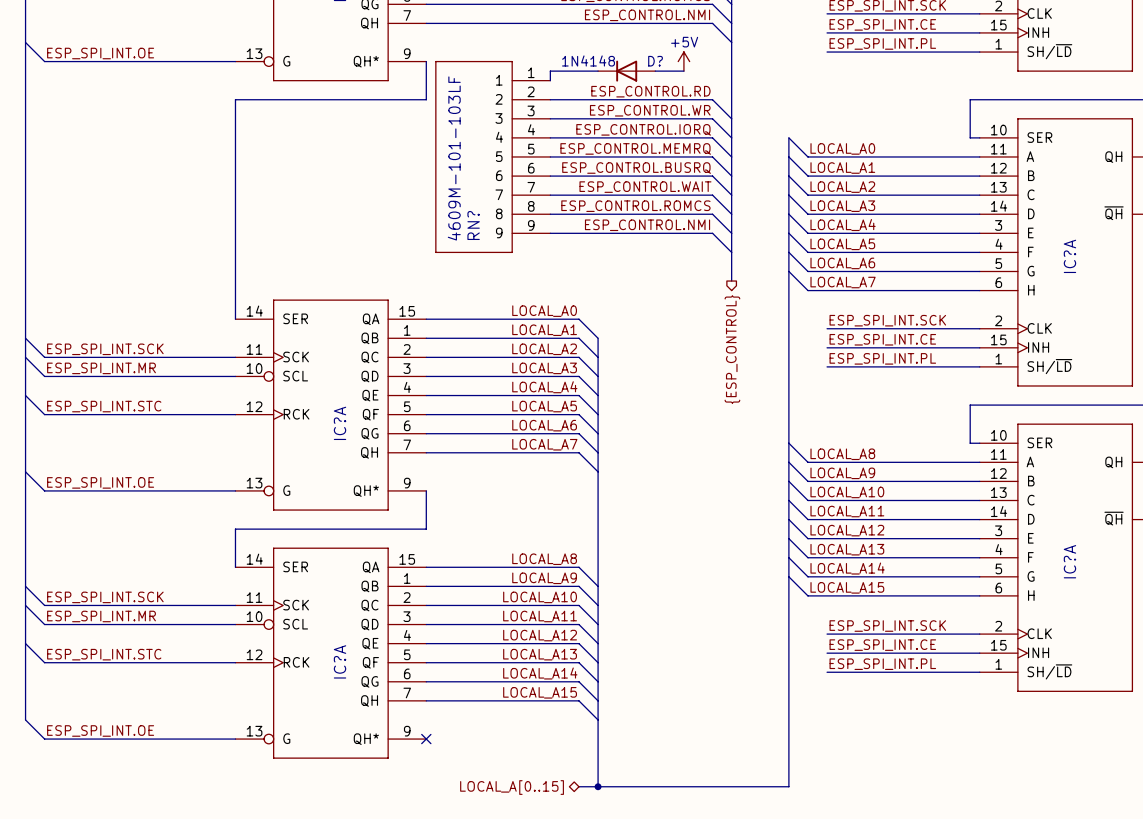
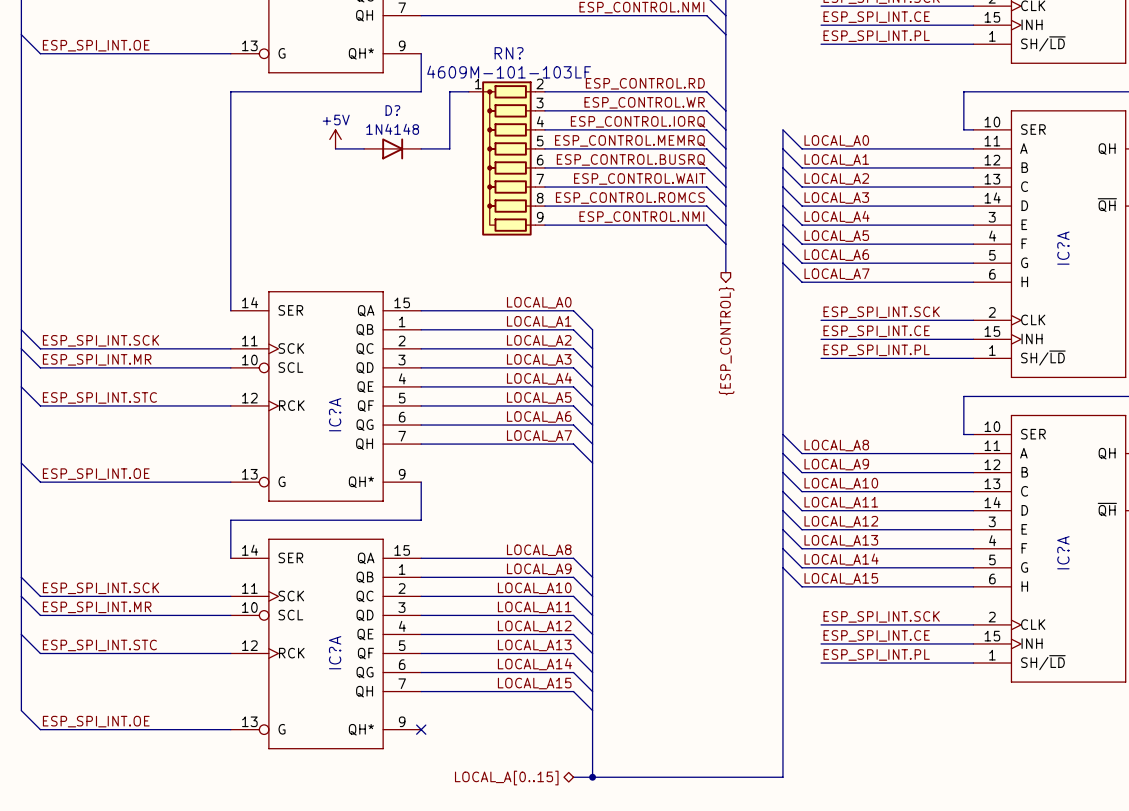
power symbol: +5V (683, 61) -> none
wire: (598, 71) (550, 71) (550, 80) -> none
D?: 1N4148 (626, 71) -> none
wire: (655, 71) (683, 71) -> none
wire: none -> (468, 91) (449, 91) (449, 148) (421, 148)
power symbol: none -> +5V (335, 139)
wire: none -> (335, 148) (364, 148)
D?: none -> 1N4148 (392, 148)
RN?: 4609M-101-103LF (493, 156) -> none
RN?: none -> 4609M-101-103LF (506, 158)

